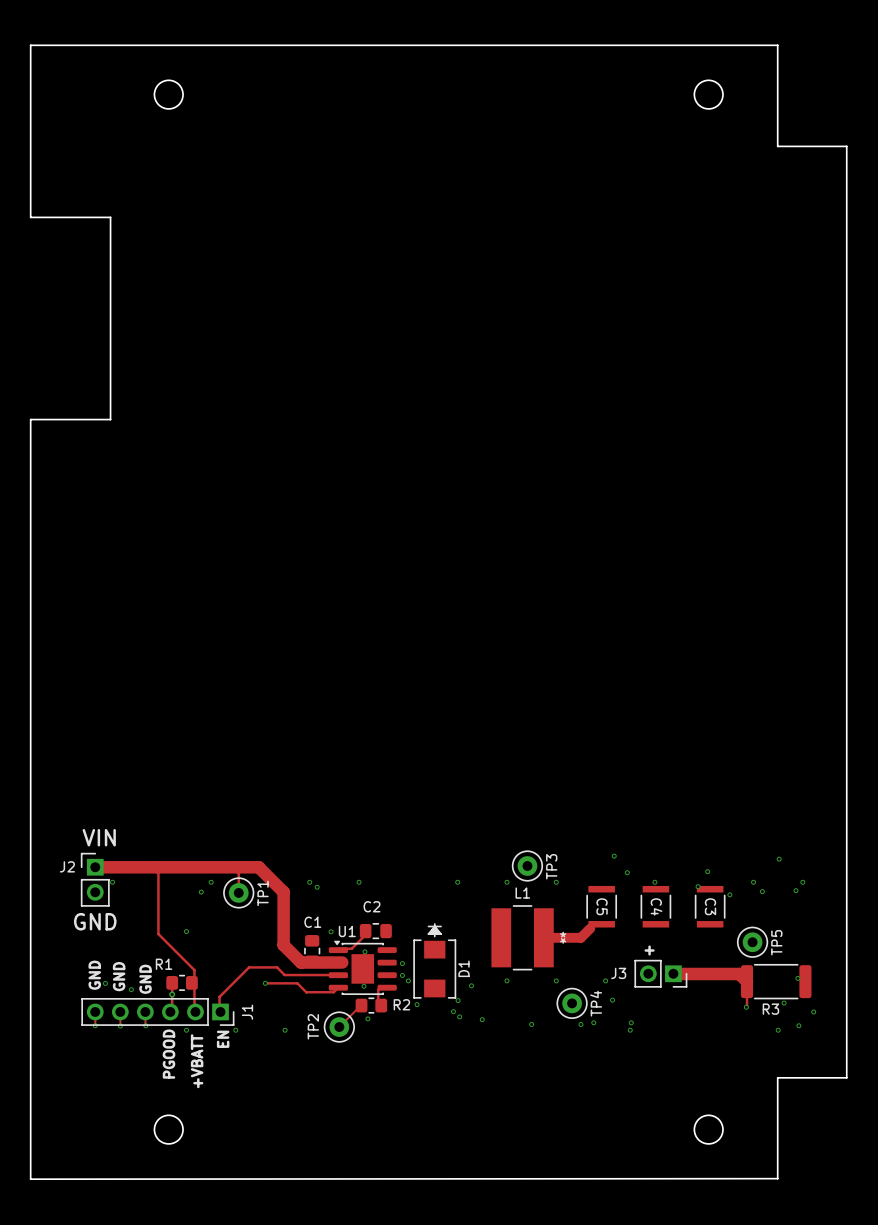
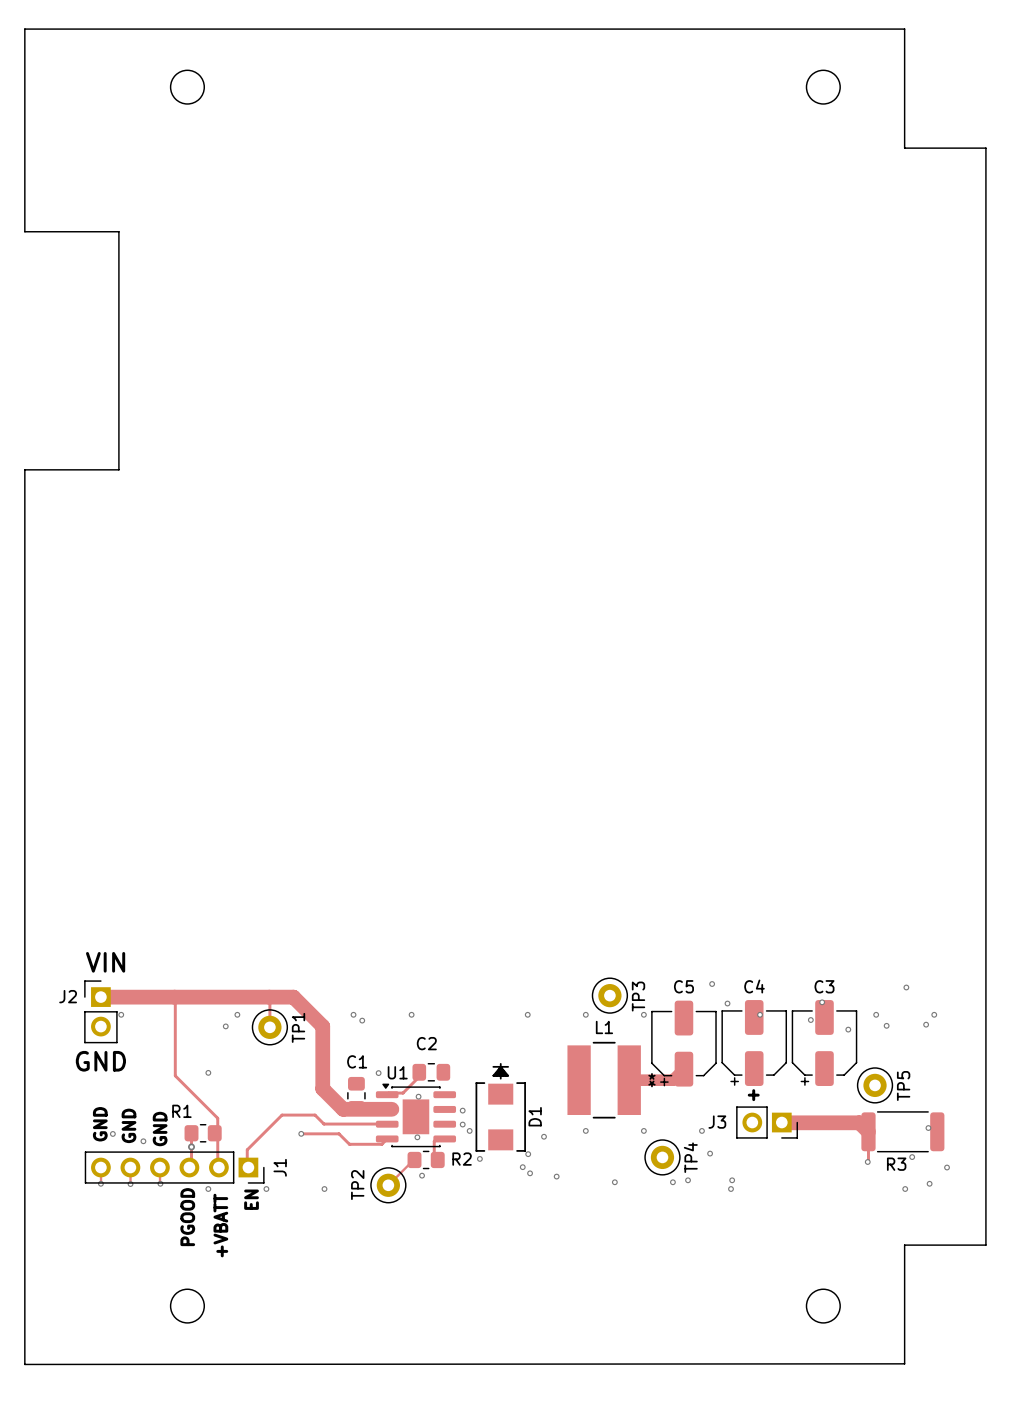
C5 footprint: [586, 885, 617, 928] -> [651, 1000, 717, 1087]
C4 footprint: [640, 885, 672, 928] -> [721, 1000, 787, 1086]
C3 footprint: [694, 885, 726, 928] -> [791, 1000, 858, 1086]
C5 name position: C5 (602, 906) -> C5 (683, 986)
C4 name position: C4 (656, 906) -> C4 (754, 986)
C3 name position: C3 (710, 906) -> C3 (824, 986)

